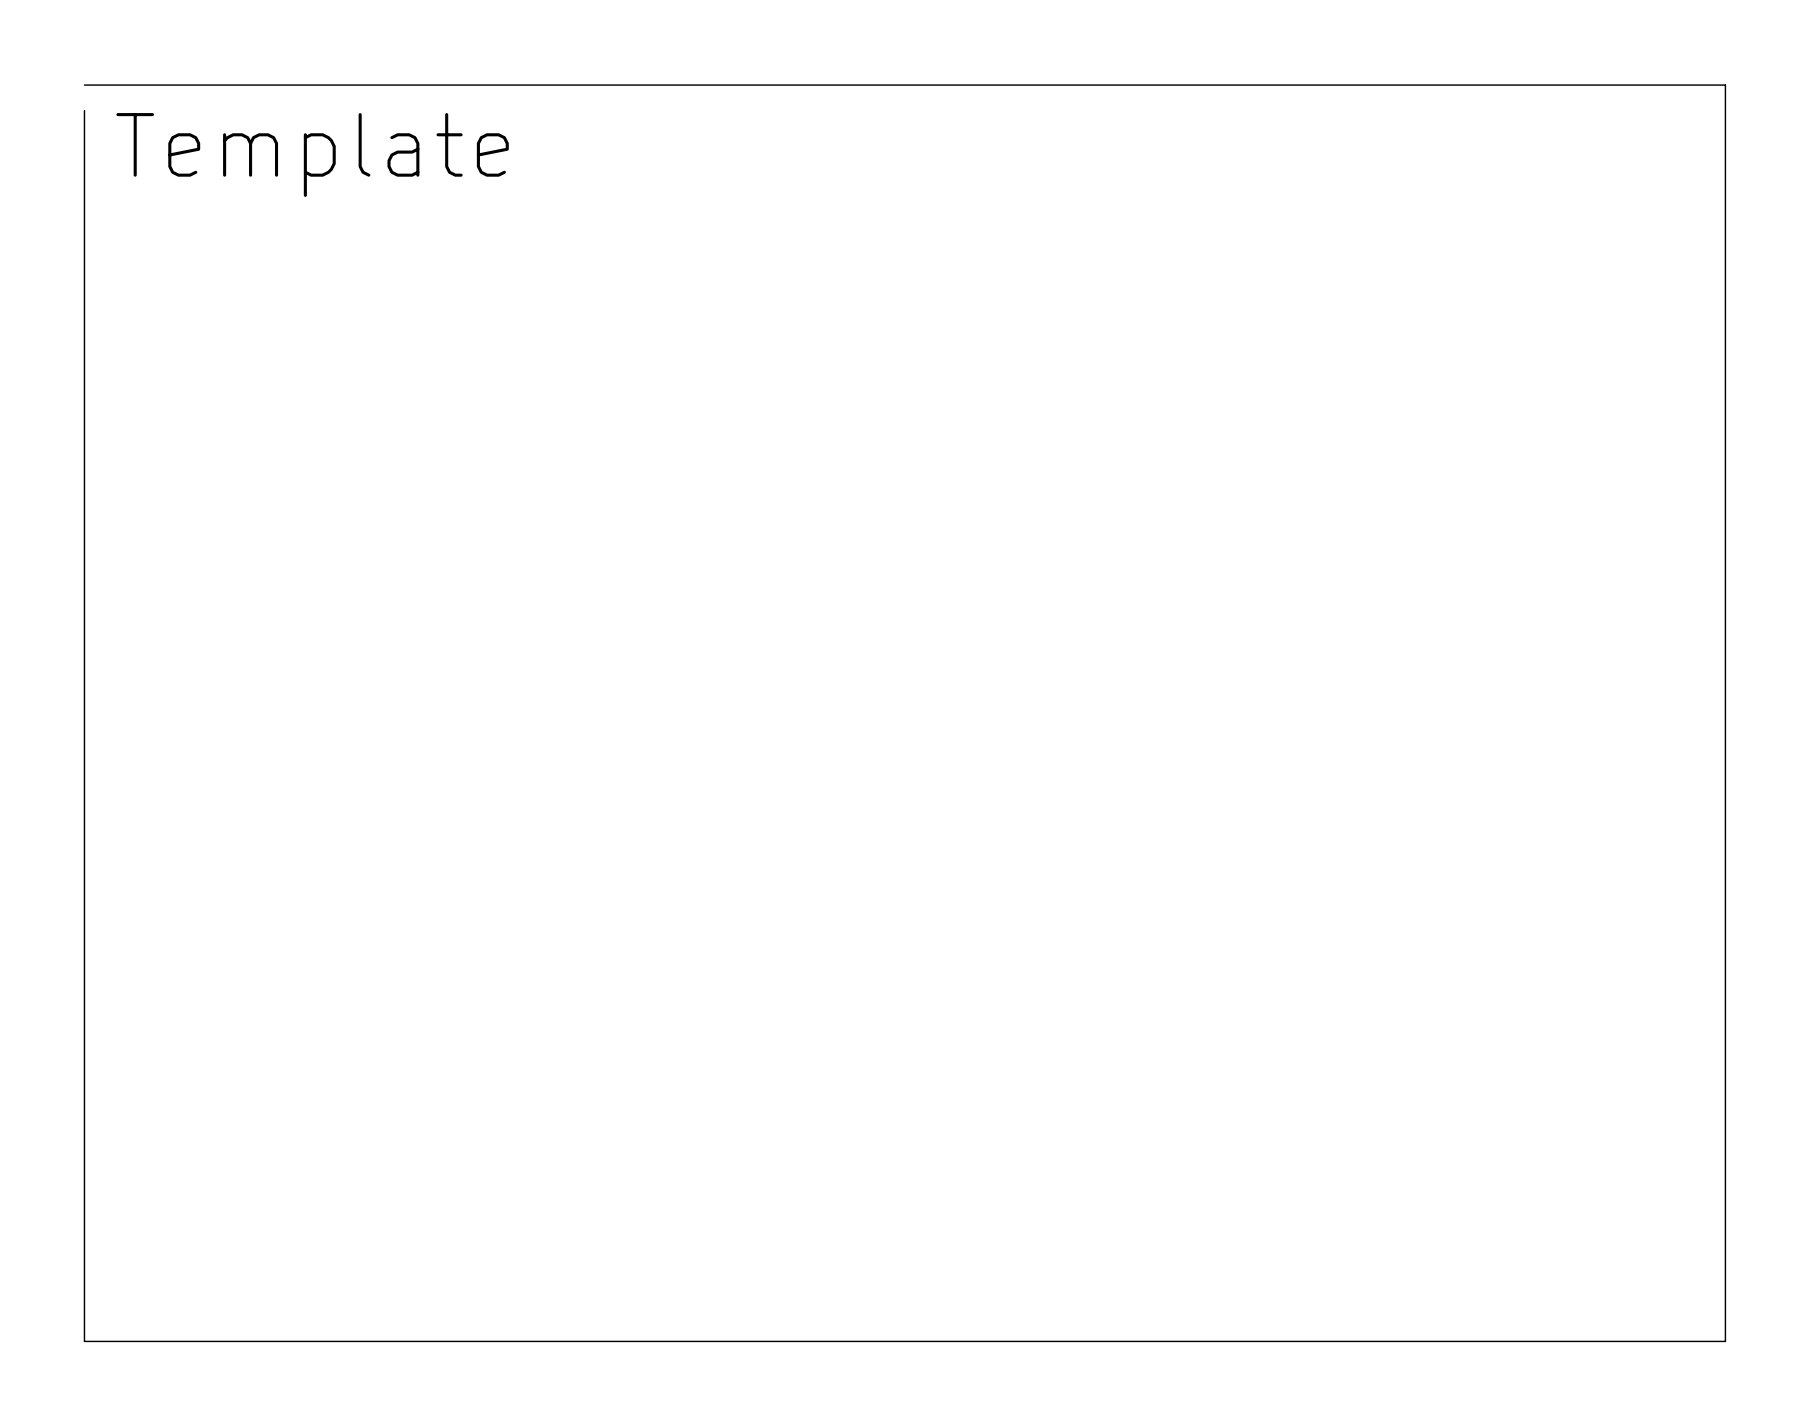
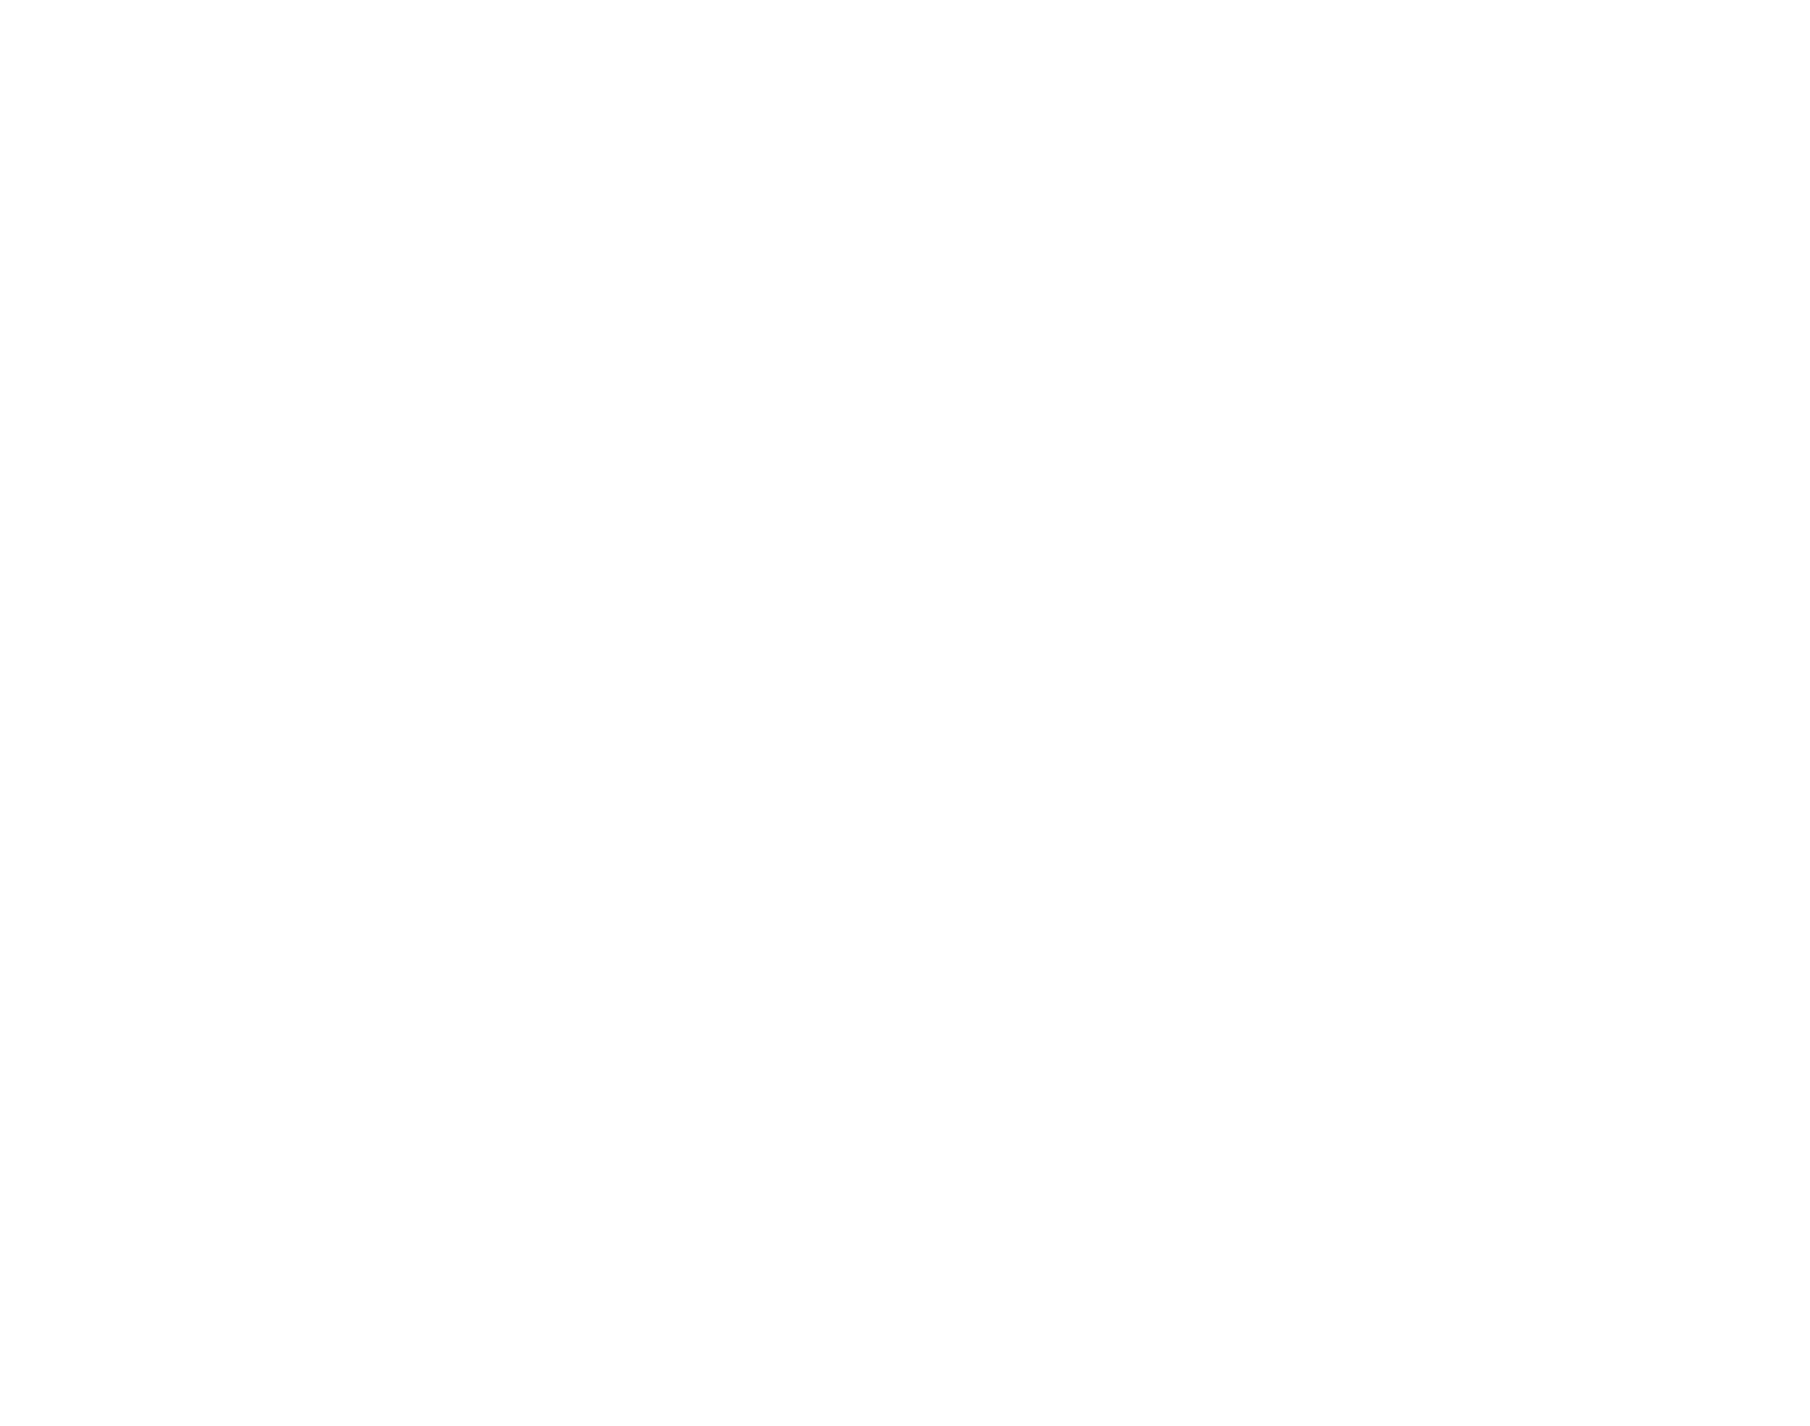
line: (84, 85) (1725, 85) (1725, 1341) (84, 1341) (84, 110) -> none
text: Template (312, 154) -> none

